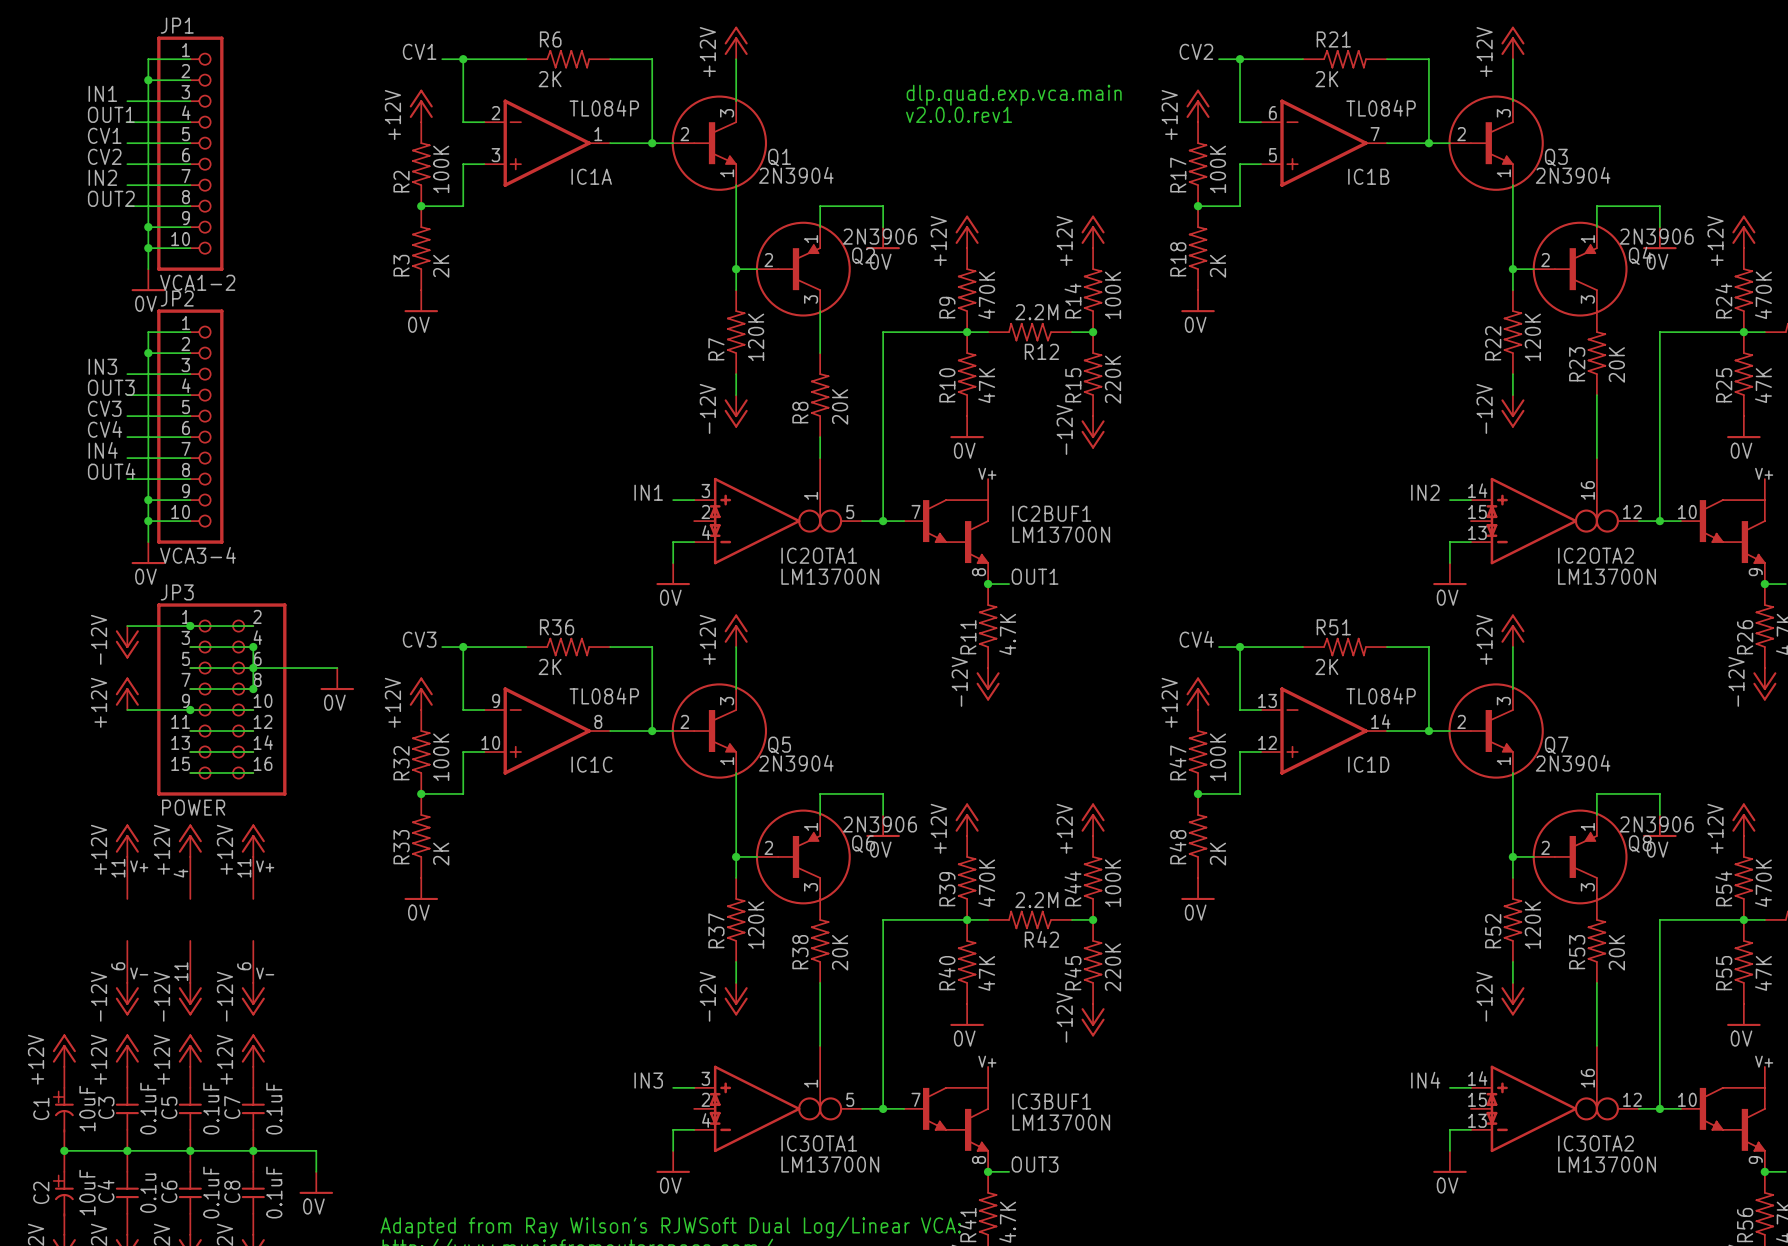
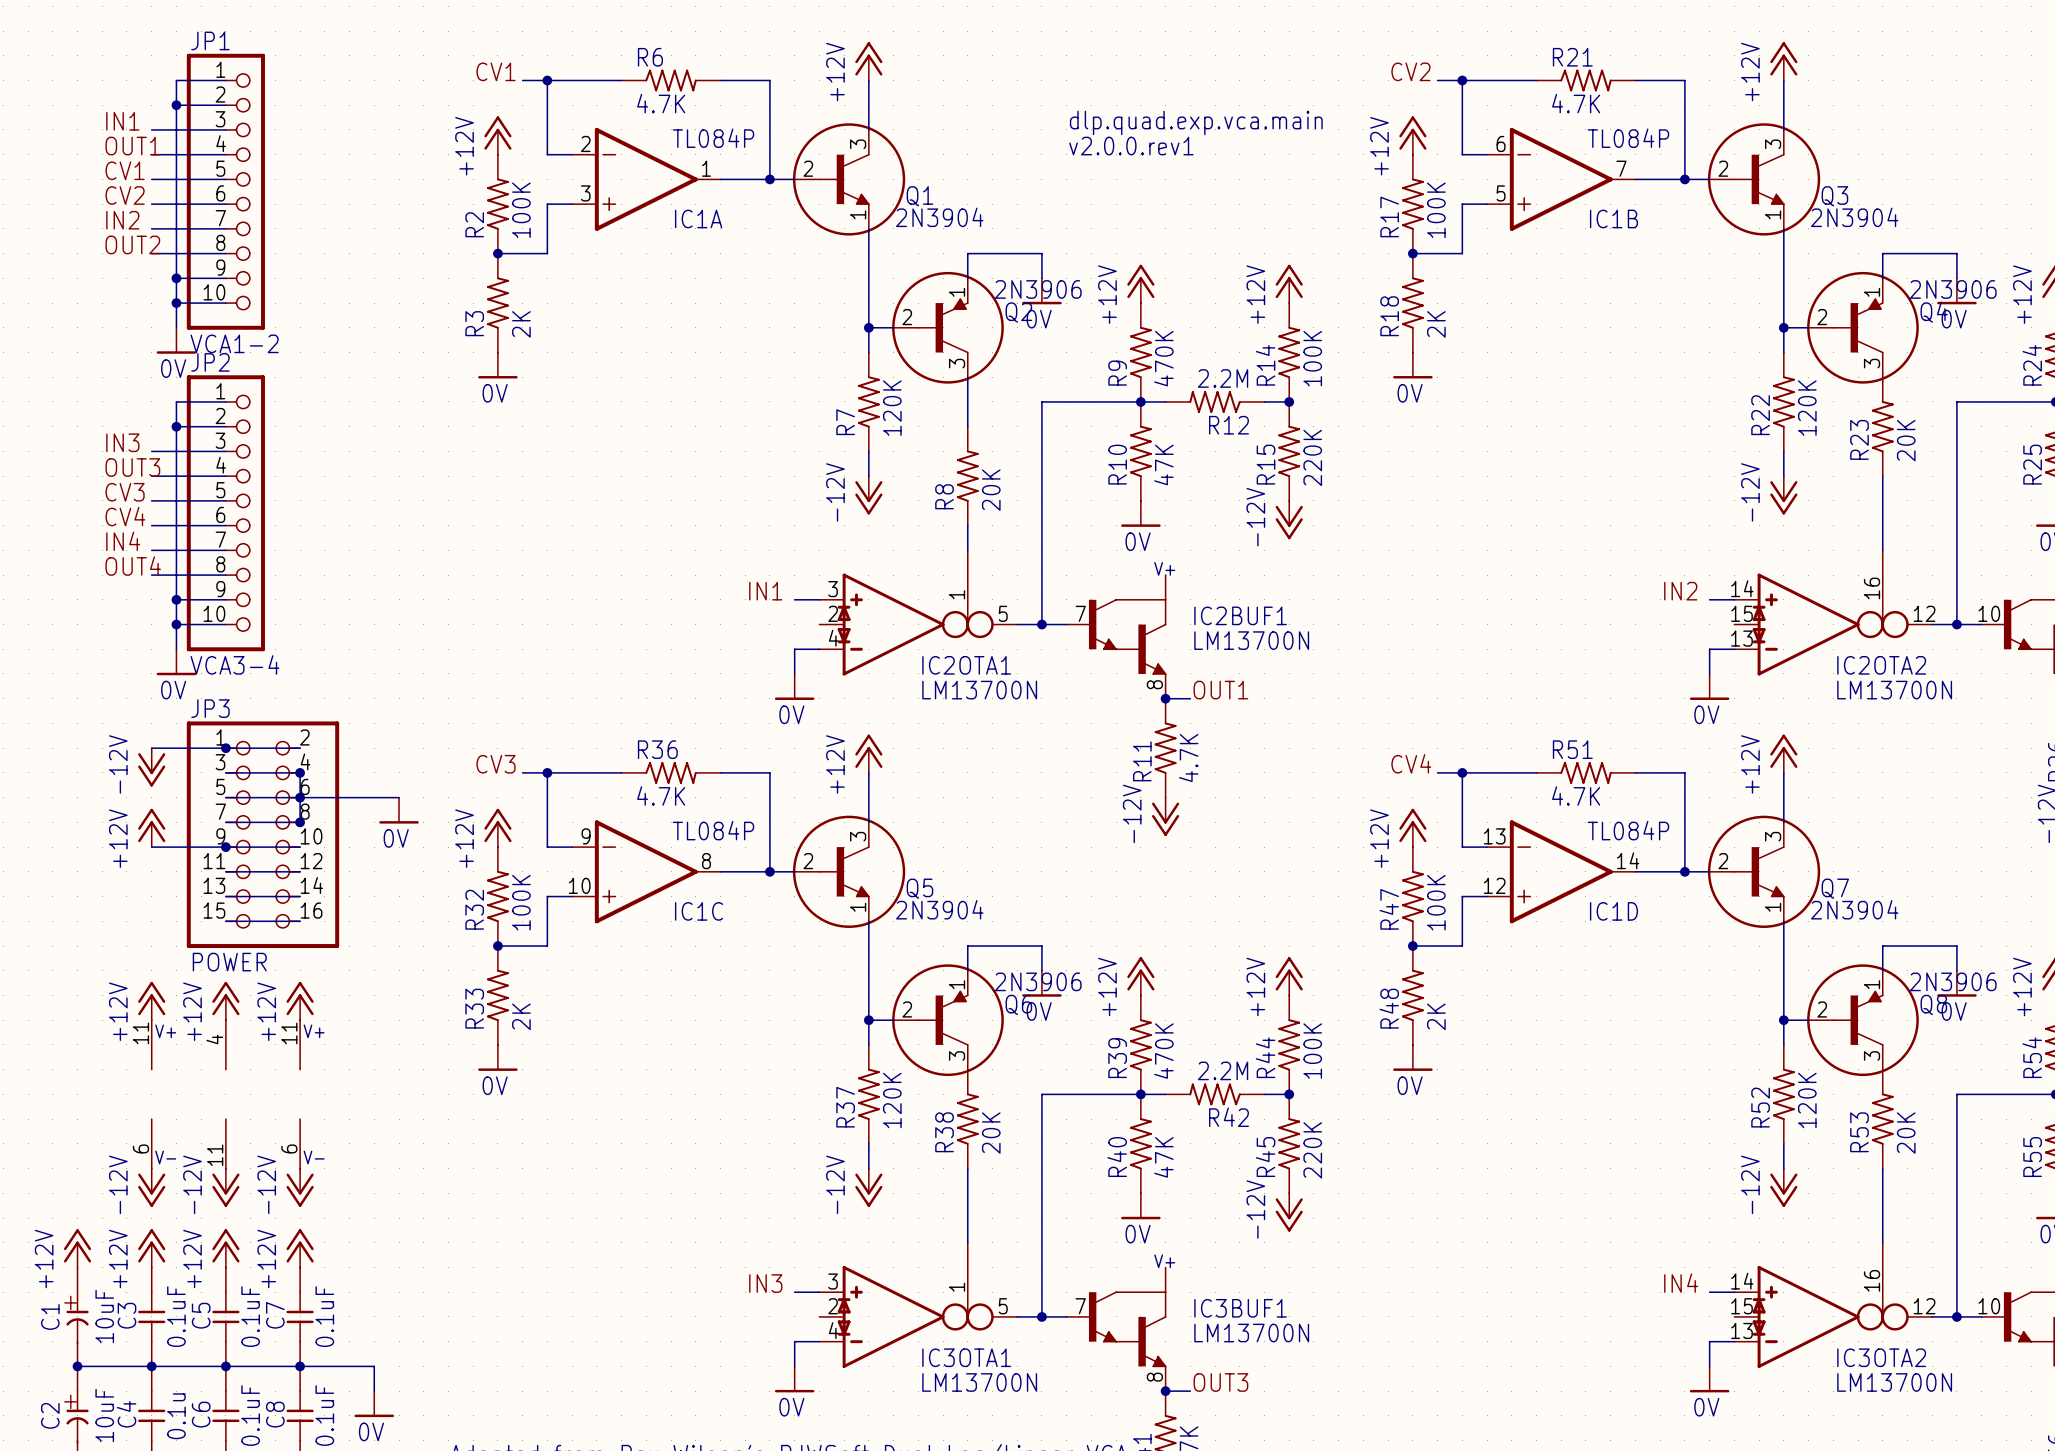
R6 value: 2K (550, 79) -> 4.7K (661, 103)
R21 value: 2K (1326, 79) -> 4.7K (1576, 103)
R36 value: 2K (550, 666) -> 4.7K (661, 795)
R51 value: 2K (1326, 666) -> 4.7K (1576, 795)

